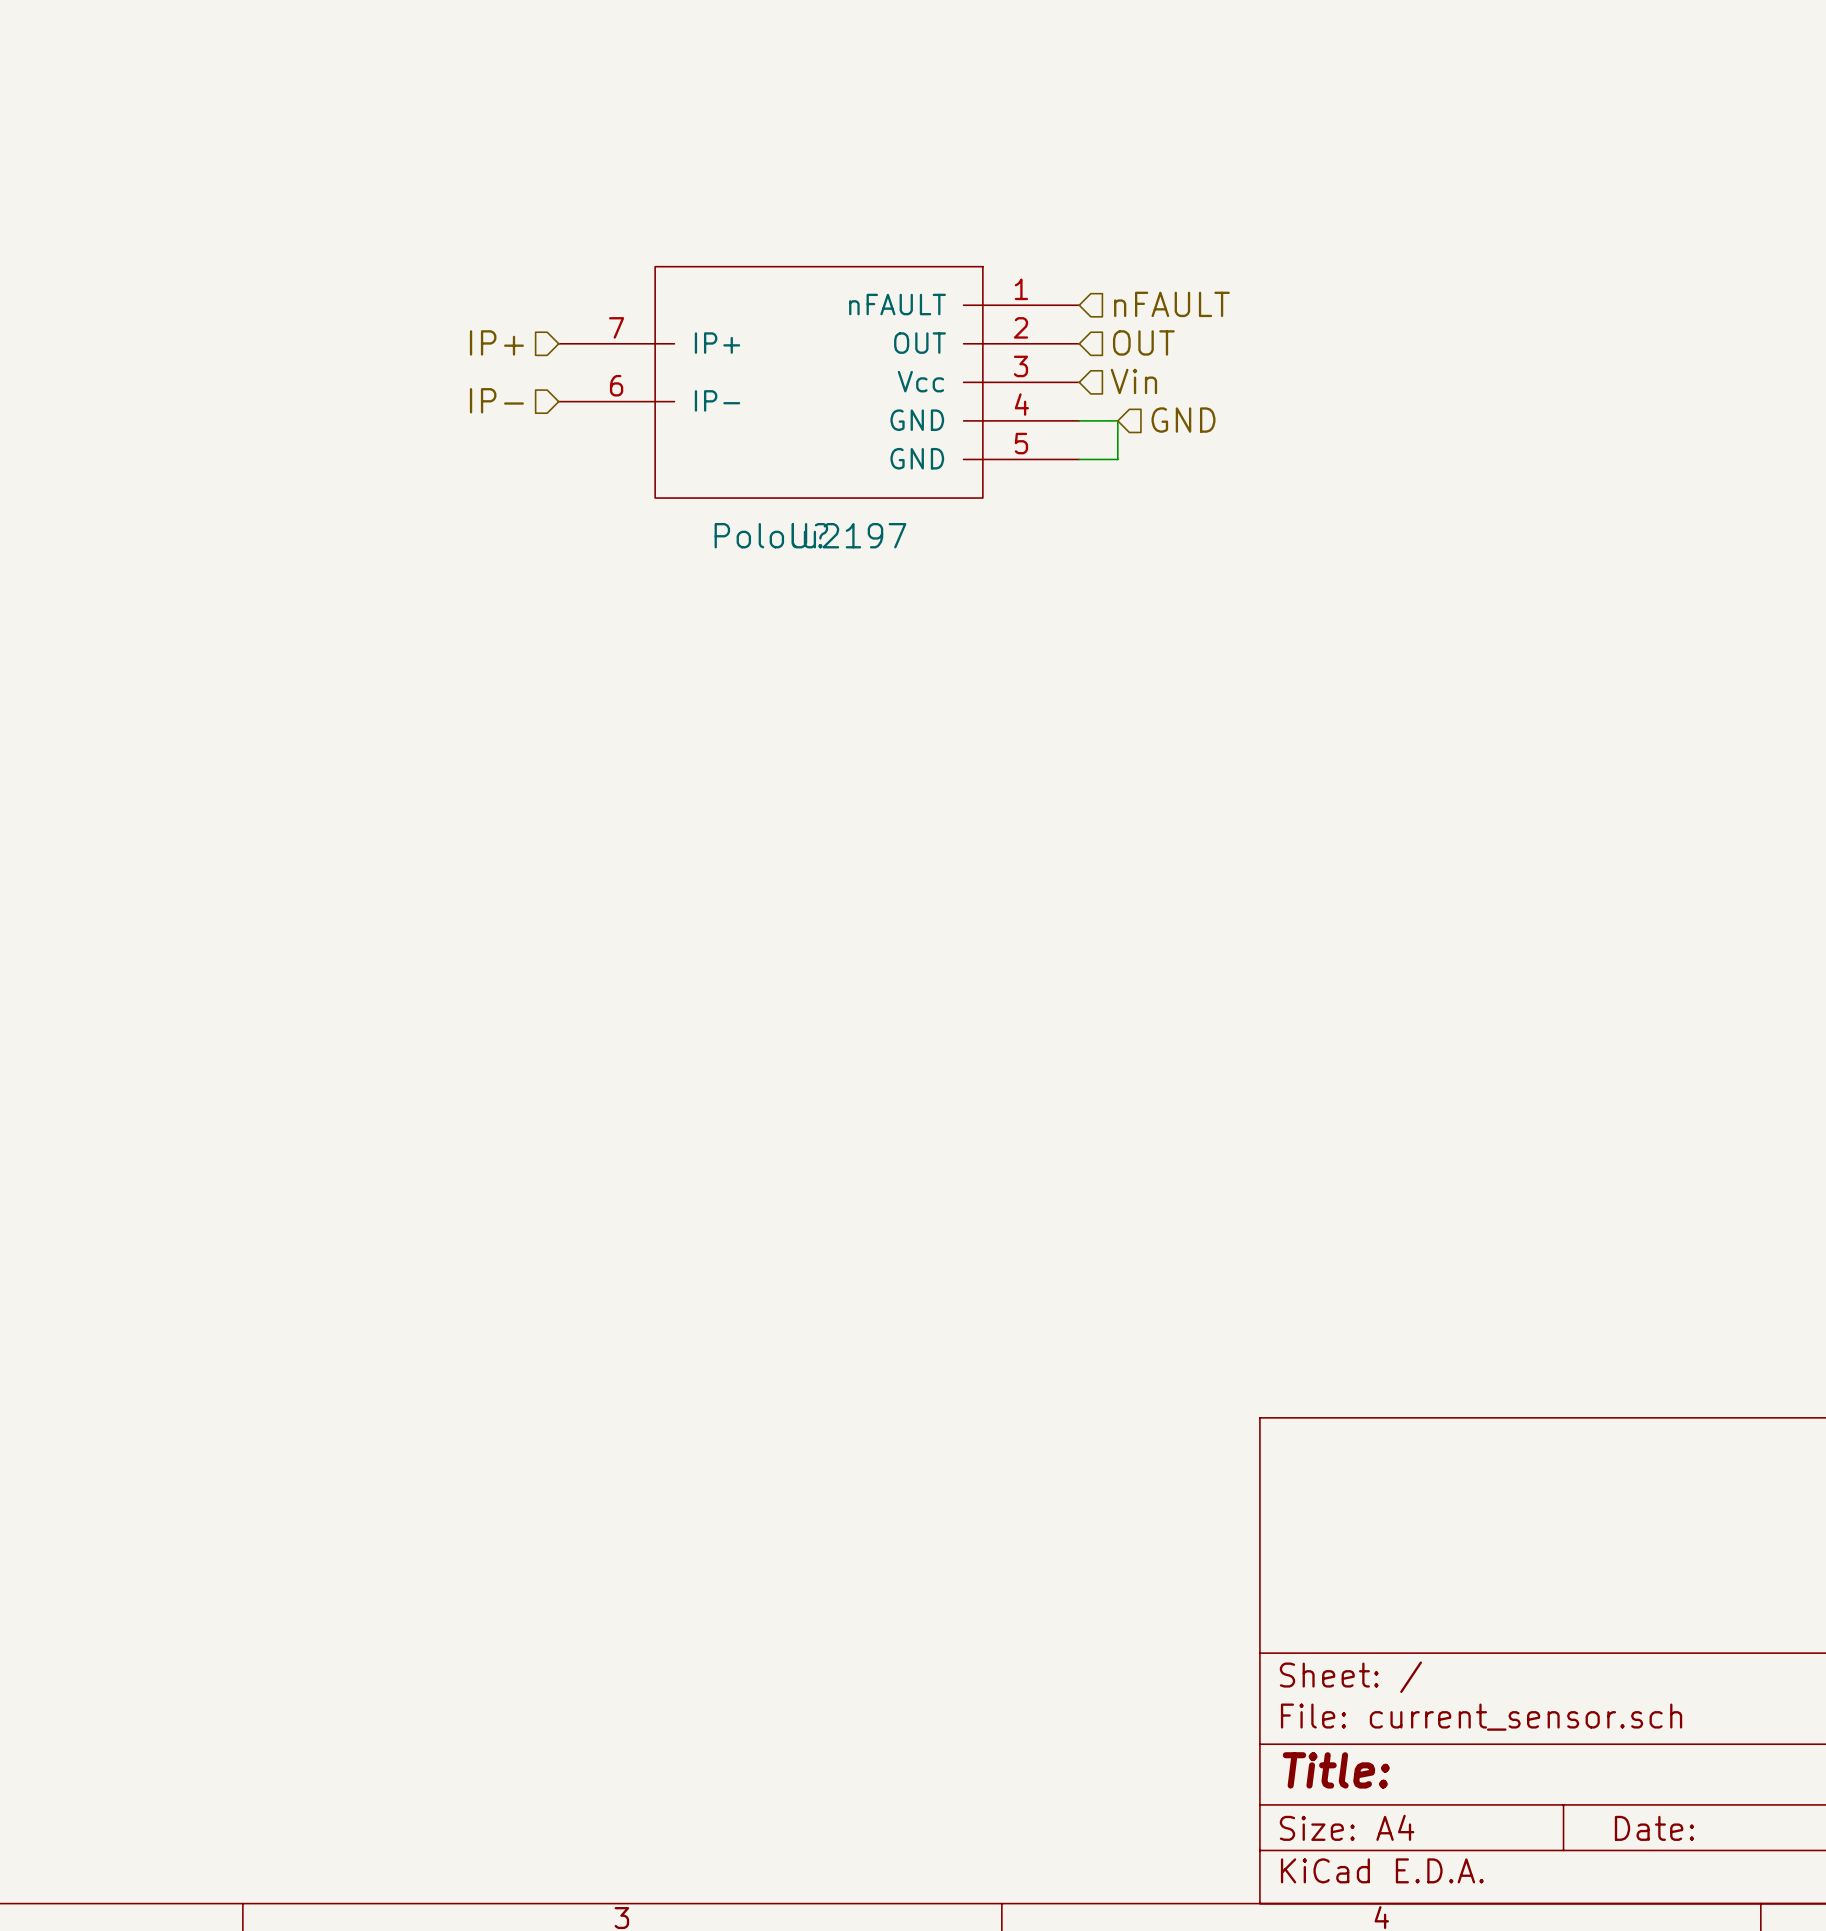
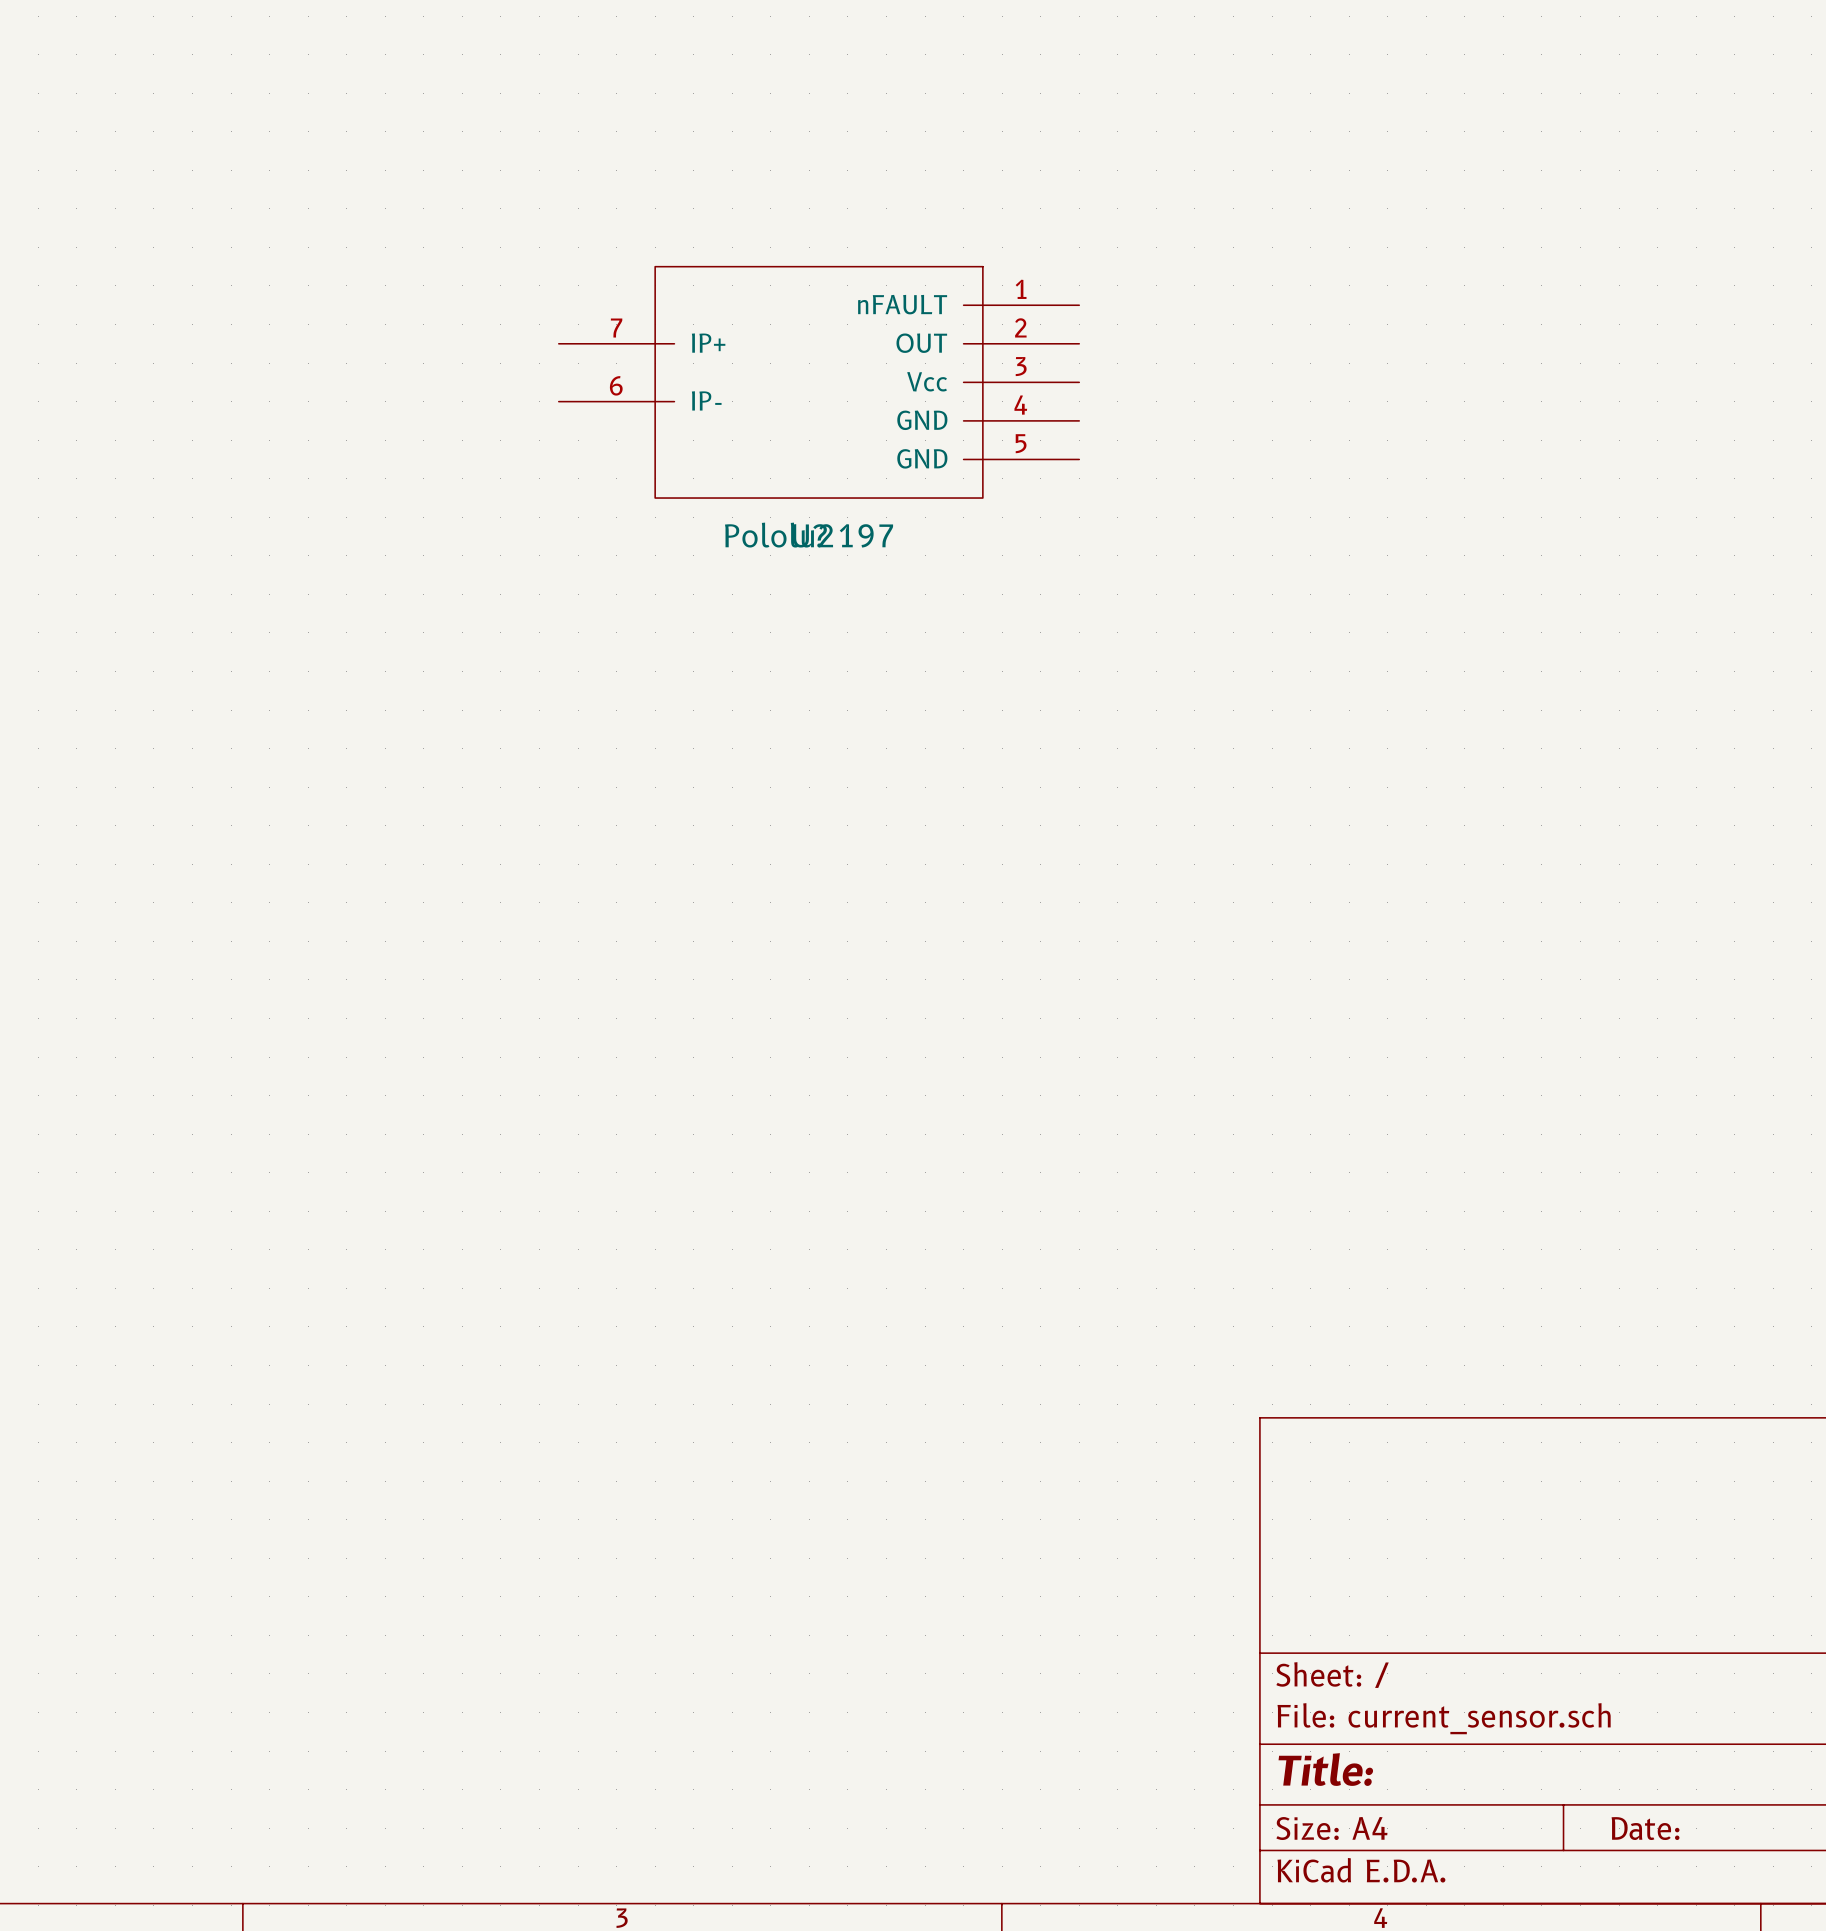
hierarchical label: nFAULT (1171, 304) -> none
hierarchical label: IP+ (496, 342) -> none
hierarchical label: OUT (1143, 342) -> none
hierarchical label: Vin (1133, 381) -> none
hierarchical label: IP- (496, 400) -> none
wire: (1079, 420) (1117, 420) (1117, 459) (1079, 459) -> none
hierarchical label: GND (1183, 420) -> none

